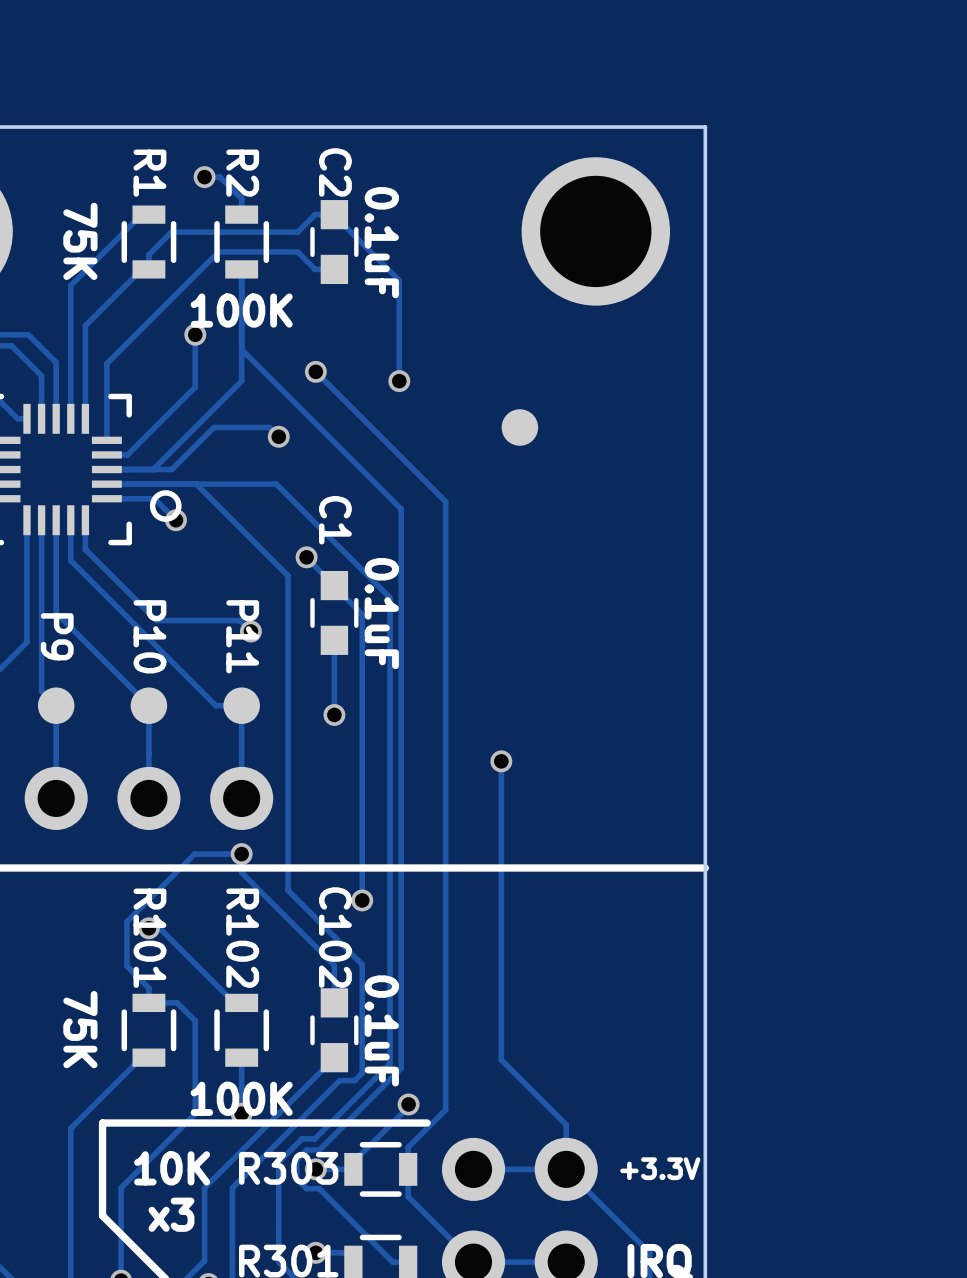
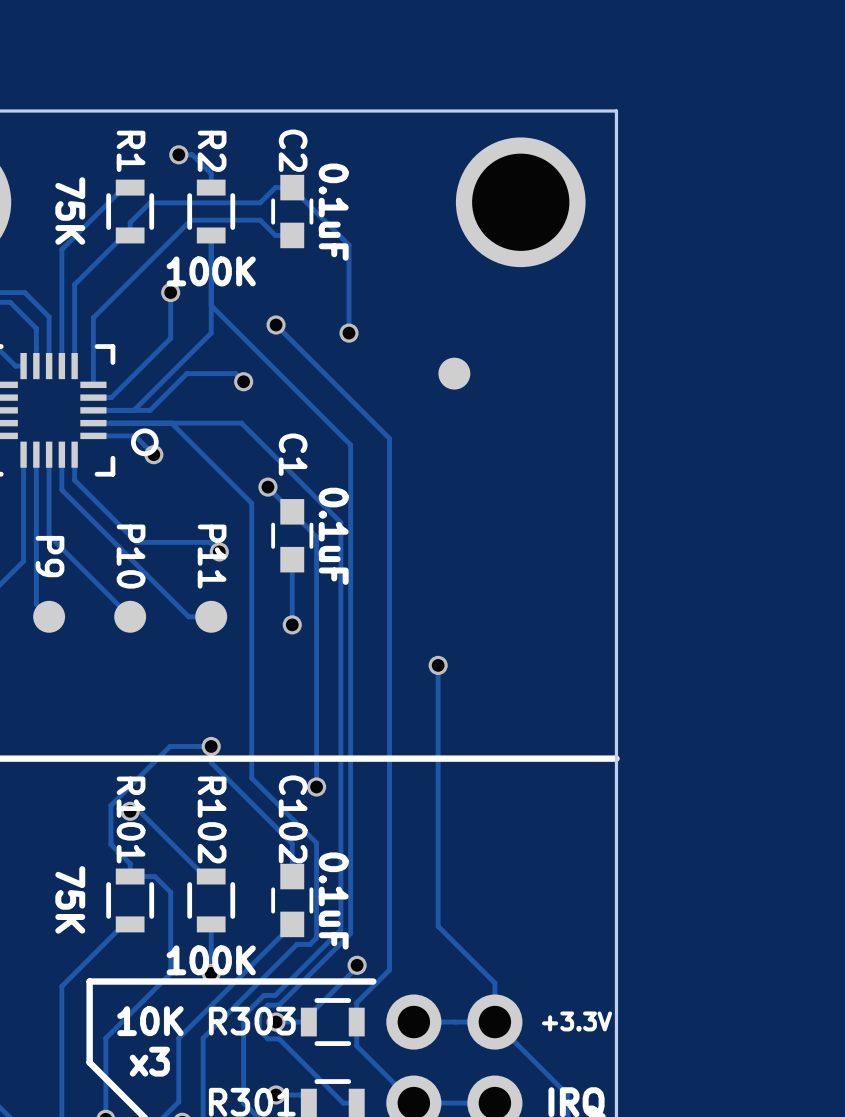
track: (56, 705) (56, 798) -> none
track: (148, 705) (148, 798) -> none
track: (241, 705) (241, 798) -> none
part: (56, 798) -> none
part: (148, 798) -> none
part: (241, 798) -> none

